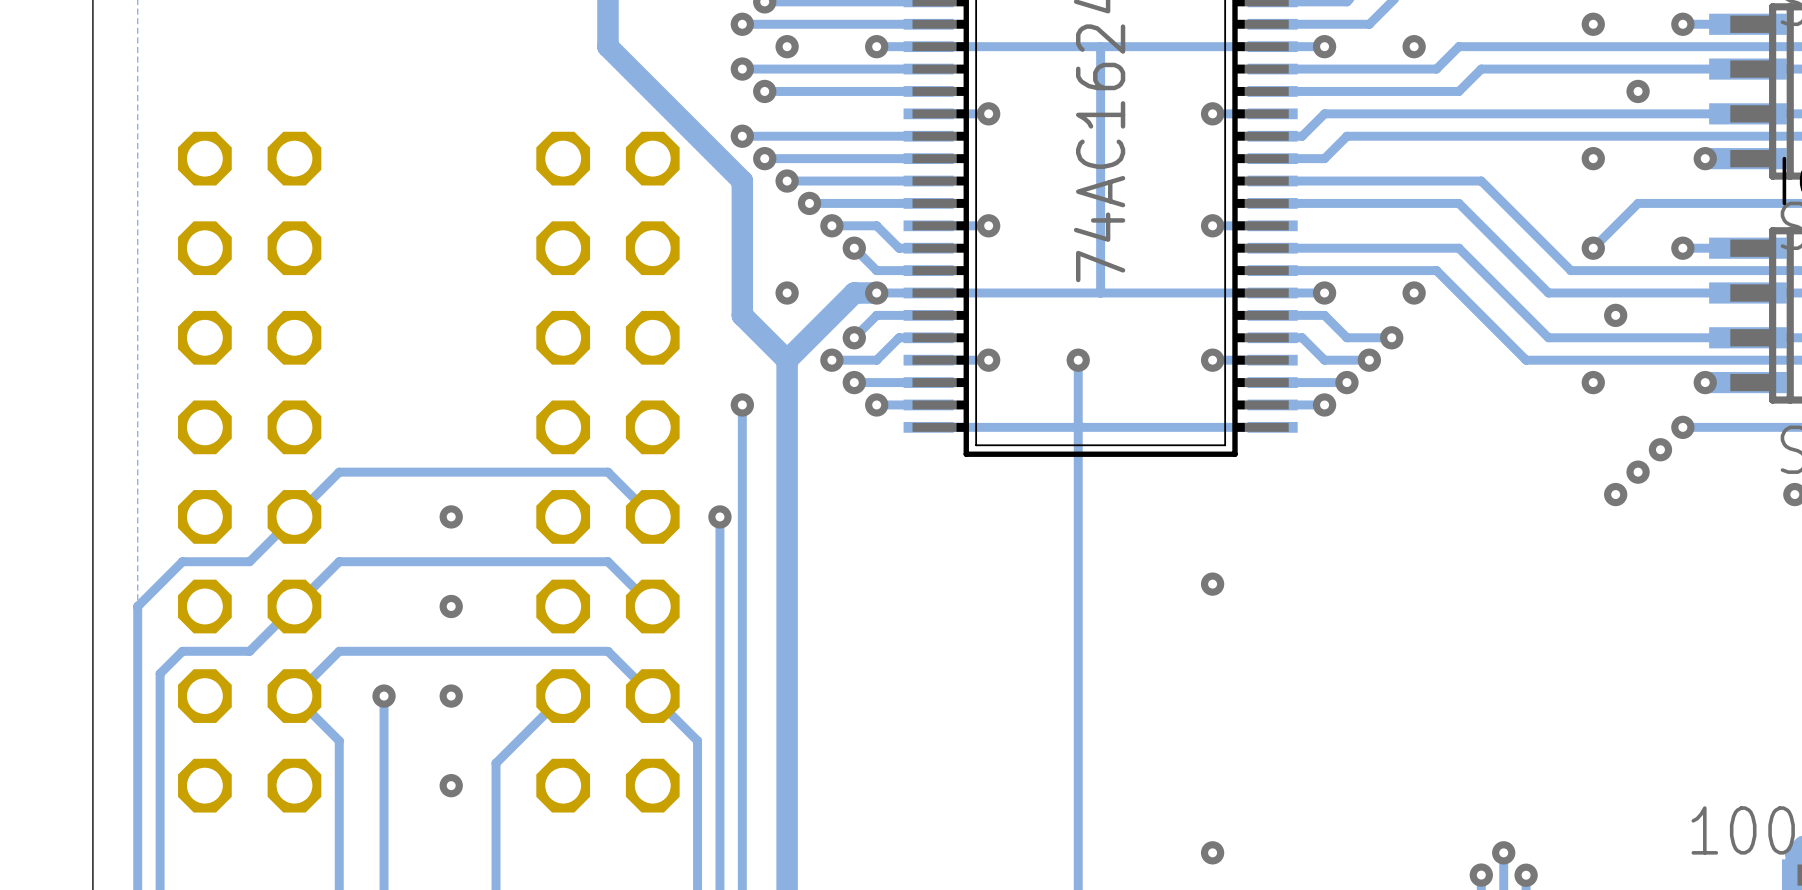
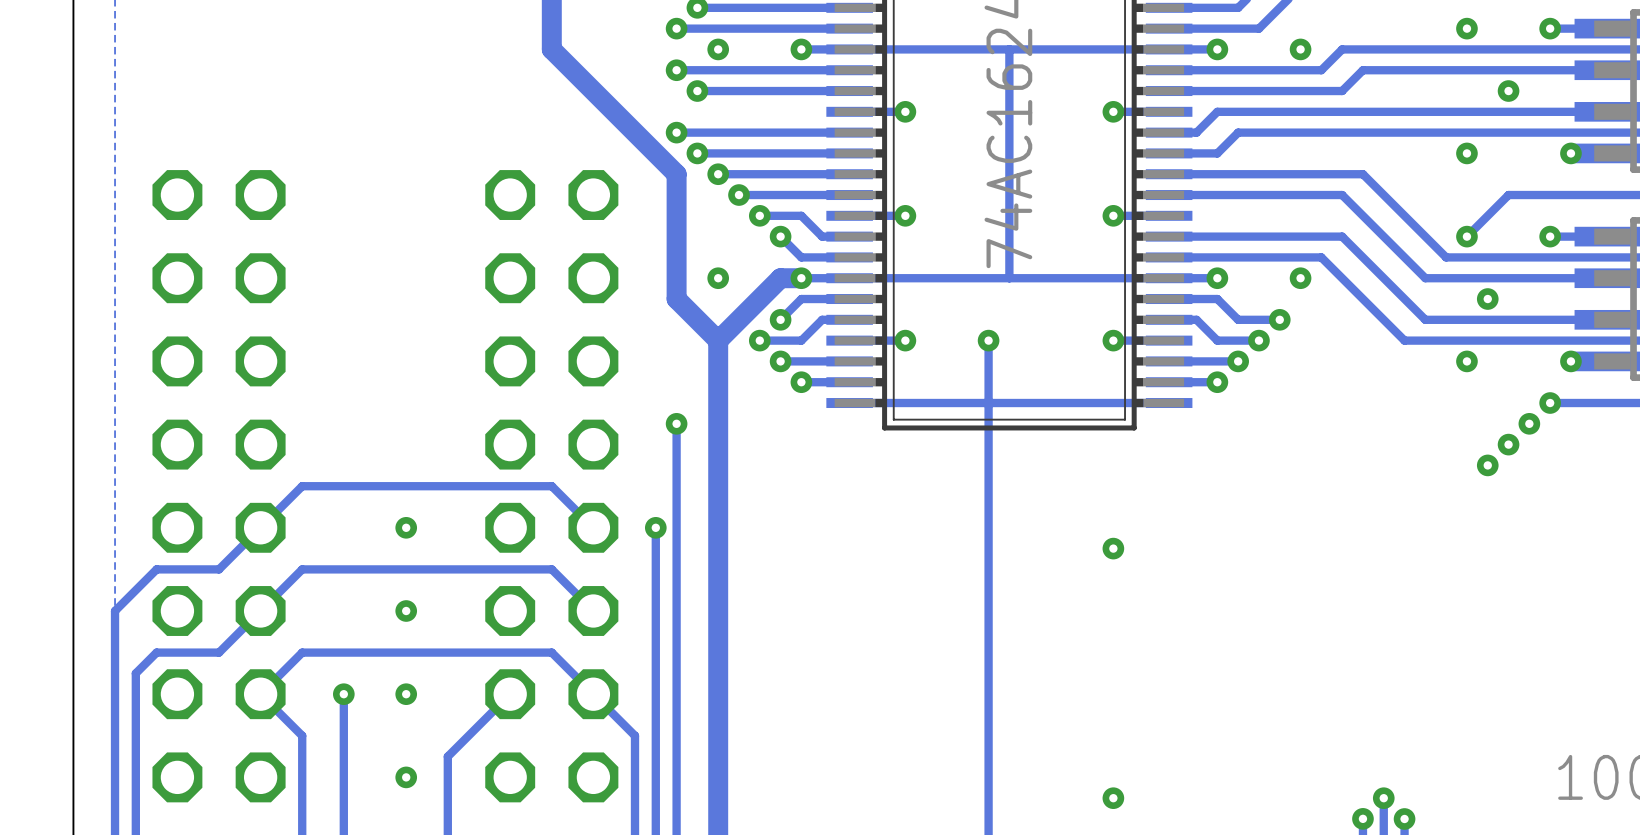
track: (742, 404) (742, 449) -> none
via: (742, 404) -> none
via: none -> (676, 423)
part position: (249, 472) -> (219, 486)
part position: (607, 472) -> (551, 486)
via: (451, 516) -> none
track: (652, 516) (607, 472) (339, 472) (249, 561) (182, 561) (137, 606) (137, 651) -> (593, 527) (551, 486) (302, 486) (219, 569) (156, 569) (115, 611)
track: (719, 516) (719, 561) -> none
via: (719, 516) -> none
via: none -> (406, 527)
via: none -> (655, 527)
via: (451, 606) -> none
track: (652, 606) (607, 561) (339, 561) (249, 651) (182, 651) (160, 673) (160, 718) -> (593, 611) (551, 569) (302, 569) (219, 652) (156, 652) (135, 673)
via: none -> (406, 611)
track: (384, 696) (384, 740) -> none
via: (384, 696) -> none
via: (451, 696) -> none
track: (563, 696) (496, 763) (496, 808) -> (510, 694) (447, 756)
via: none -> (343, 694)
via: none -> (406, 694)
via: (451, 785) -> none
track: (697, 785) (697, 740) (607, 651) (339, 651) (294, 696) (339, 740) (339, 785) -> (635, 735) (551, 652) (302, 652) (260, 694) (302, 735)
via: none -> (406, 777)

